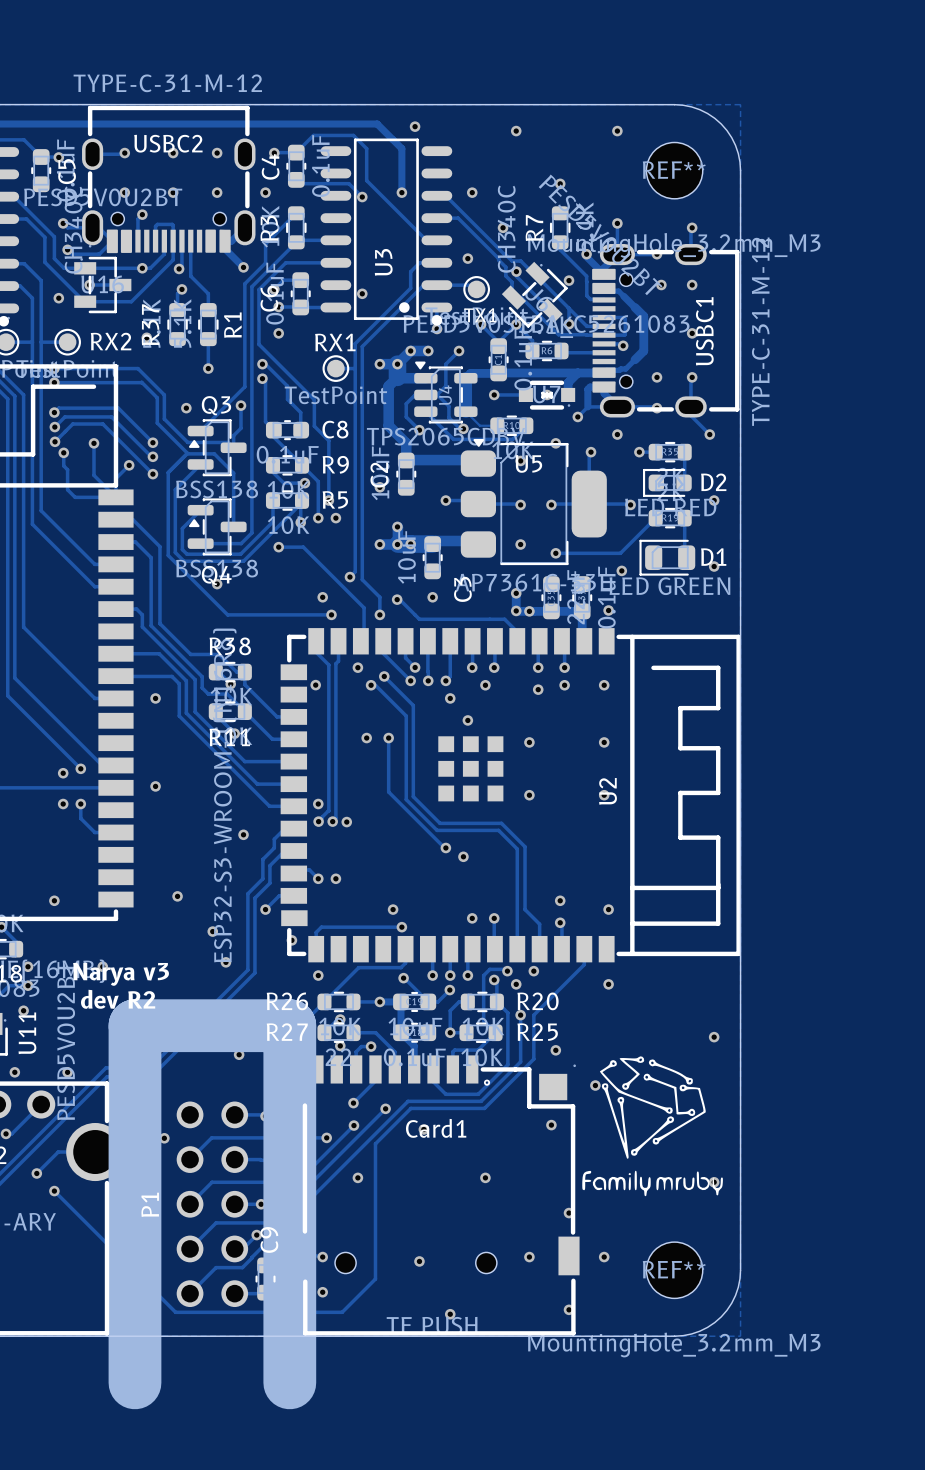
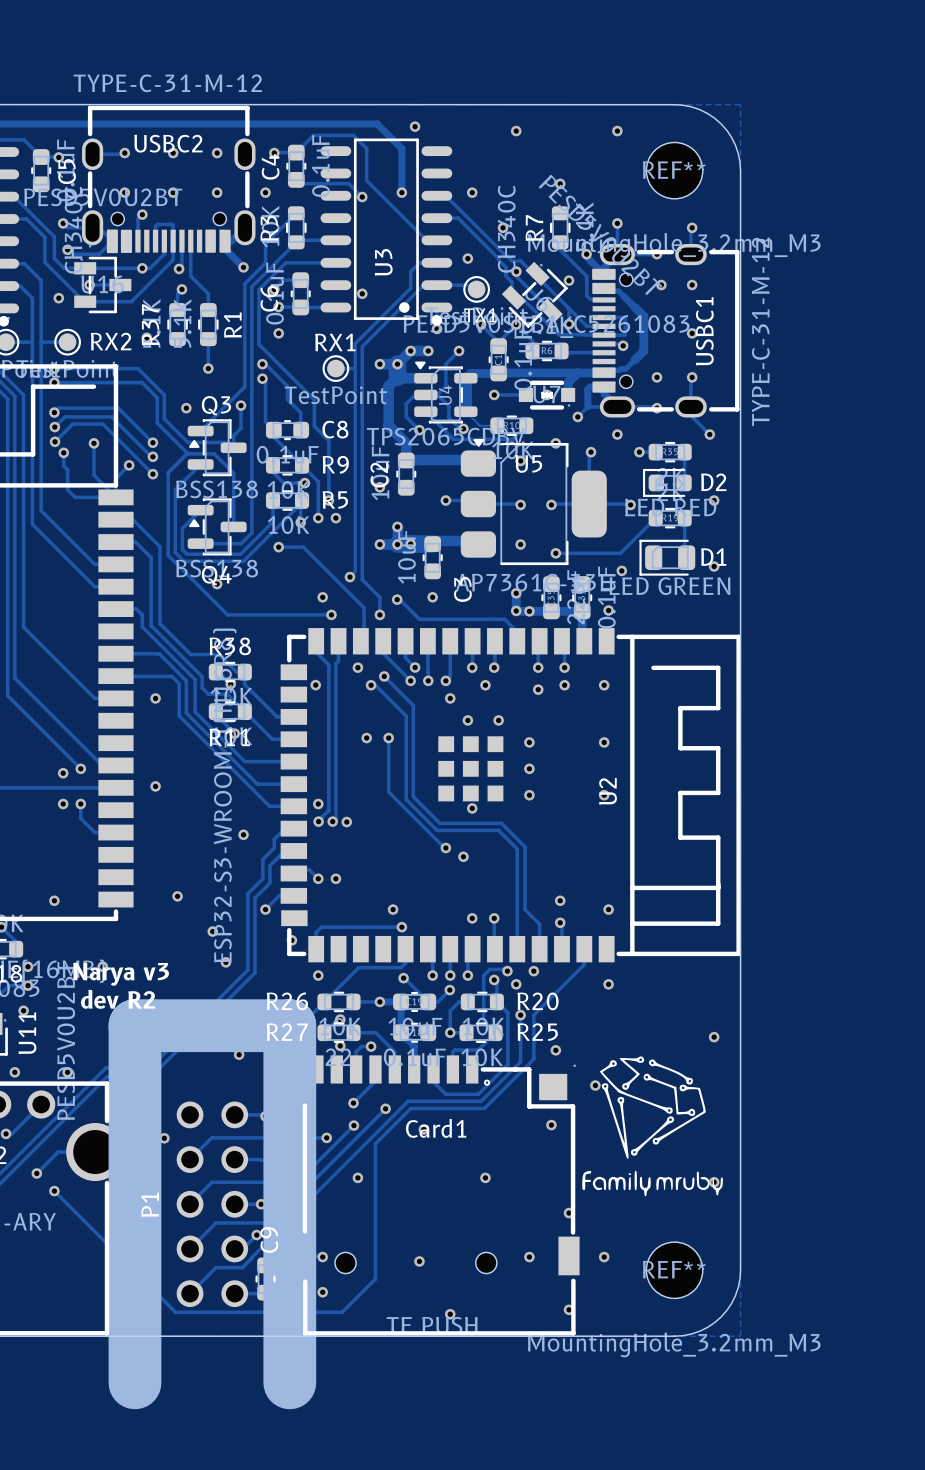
via: none -> (498, 720)
via: none -> (529, 768)
via: none -> (472, 808)

